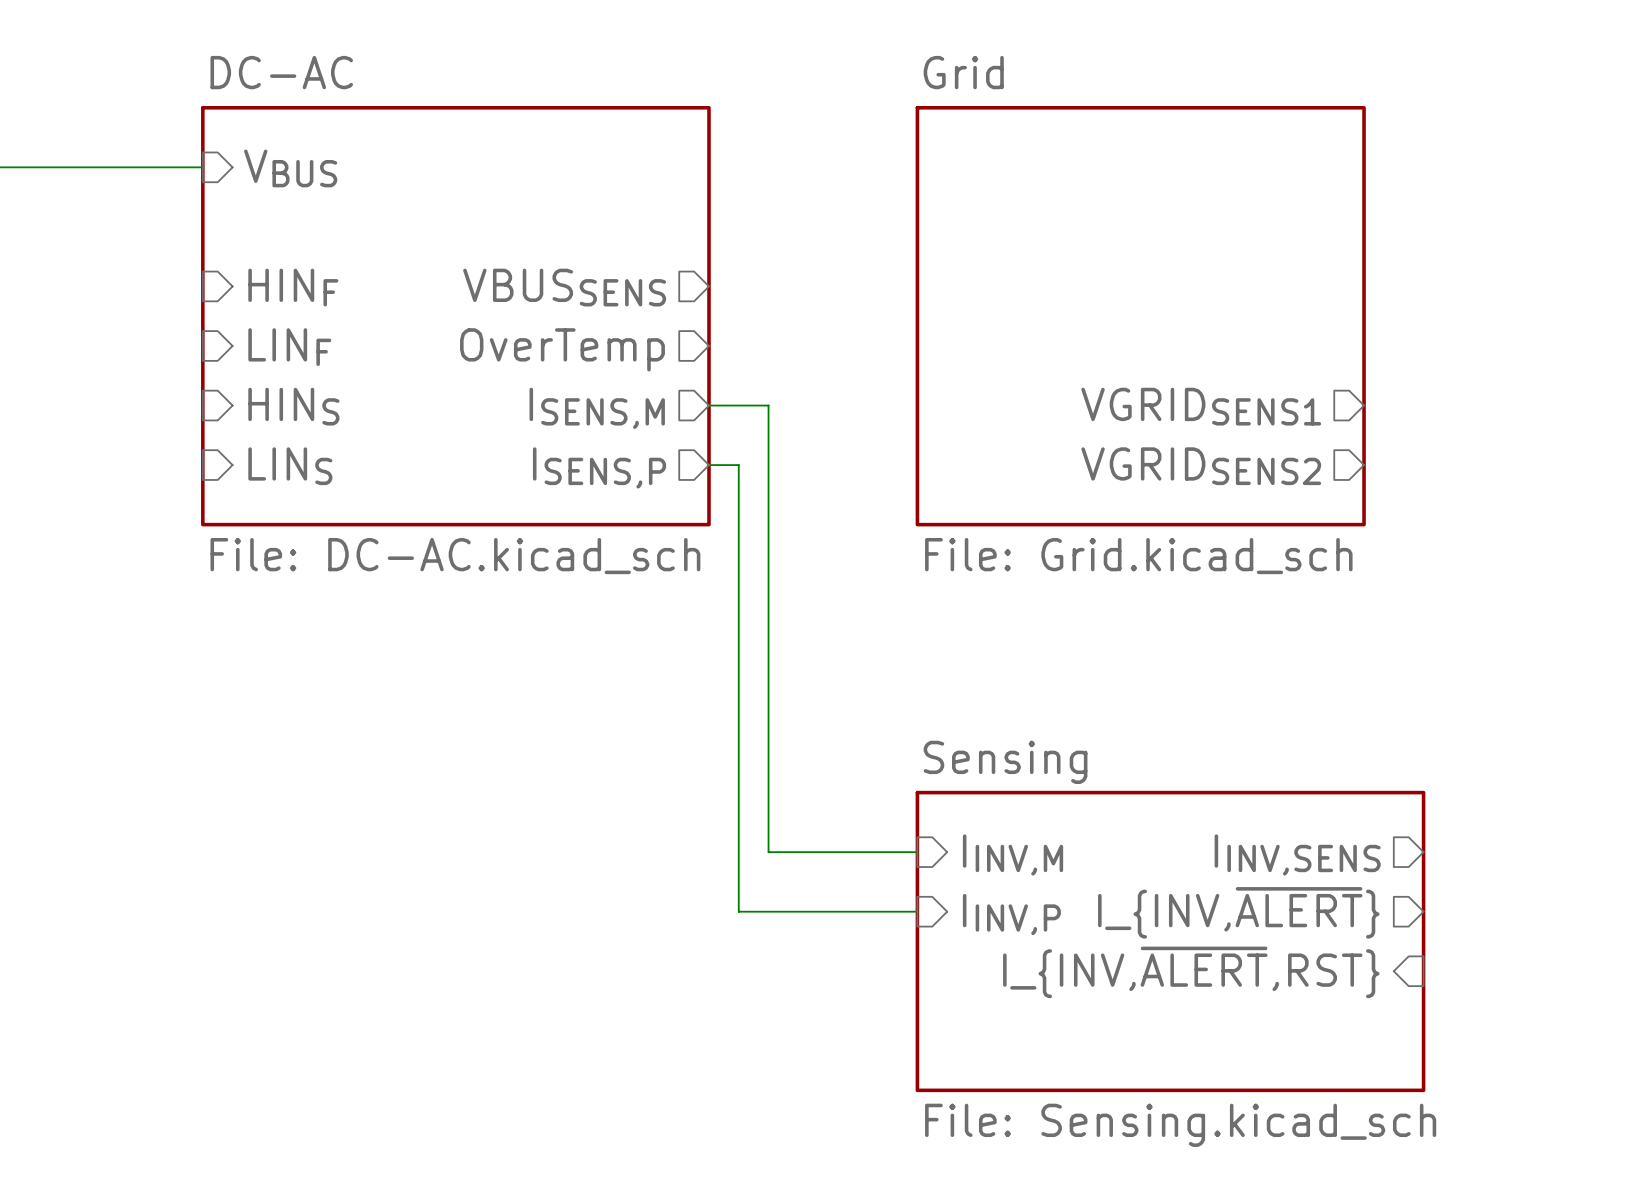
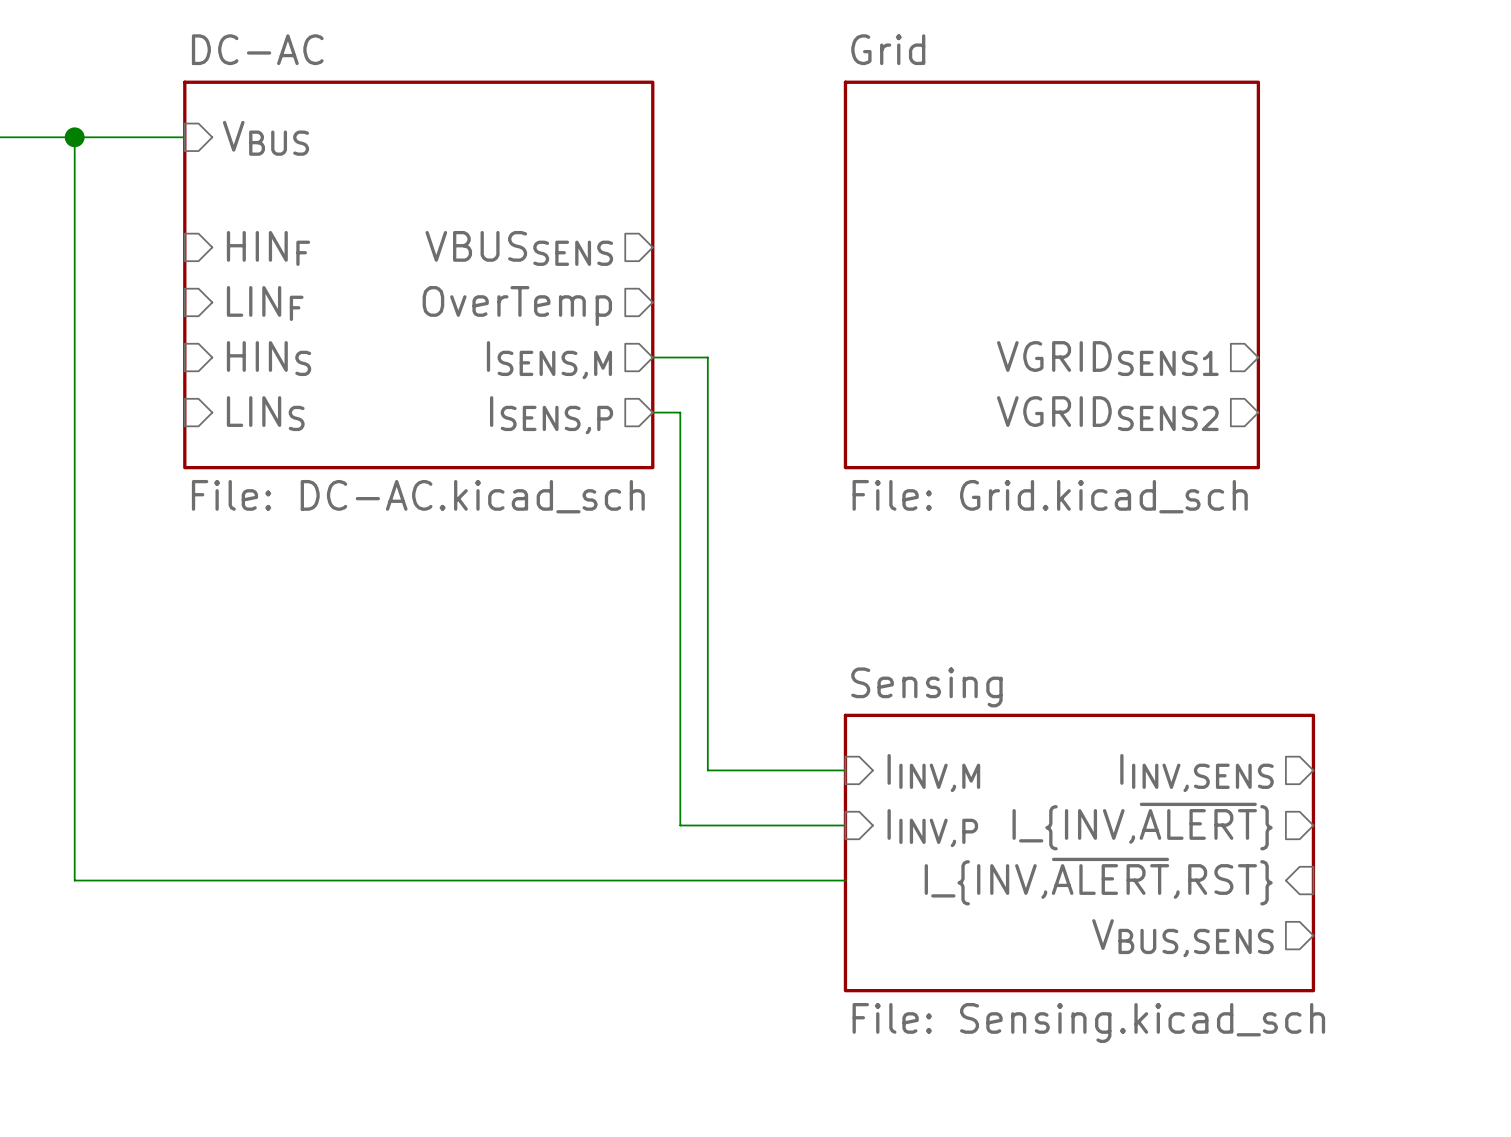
wire: none -> (74, 137) (74, 880) (845, 880)
junction: none -> (74, 137)
sheet pin: none -> VBUS,SENS (1182, 938)

